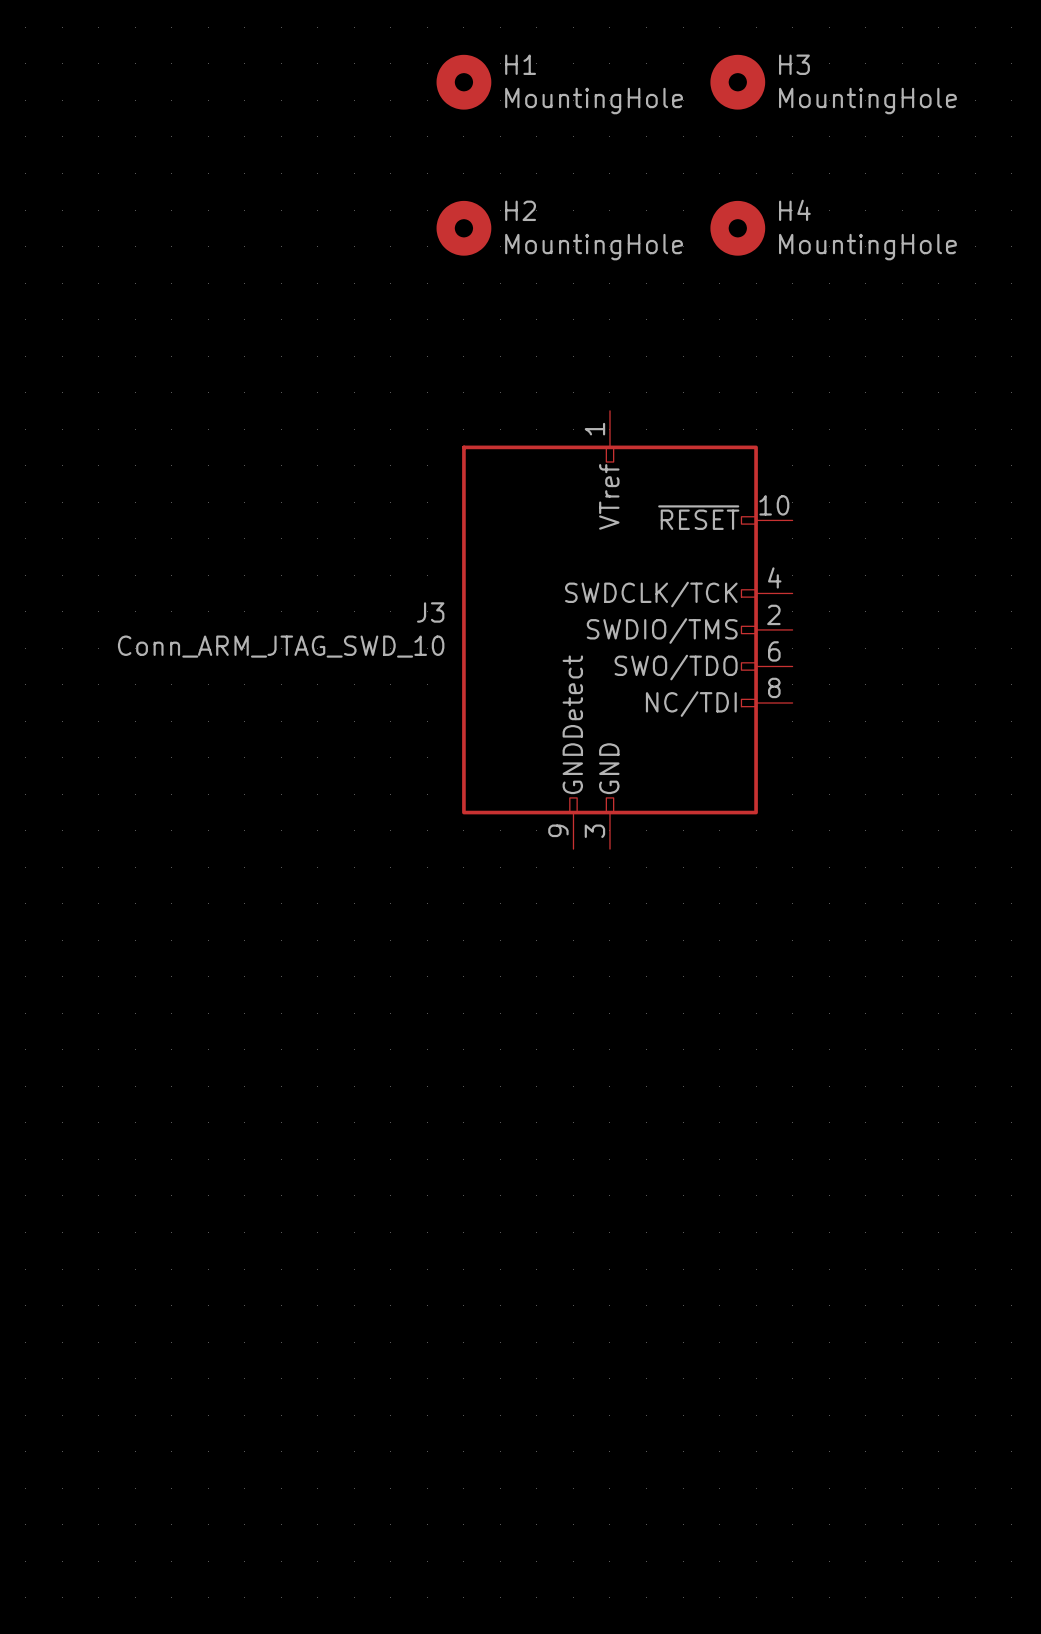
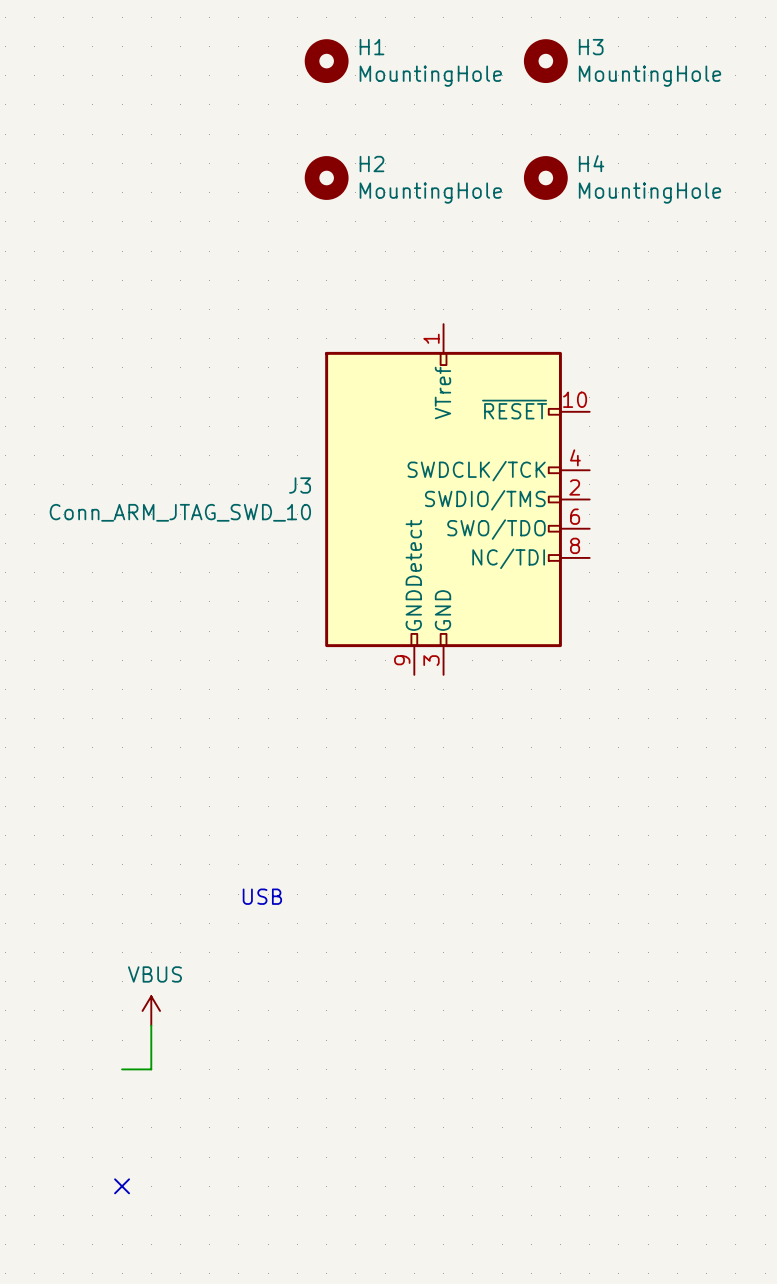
text: none -> USB (262, 896)
power symbol: none -> VBUS (151, 1010)
wire: none -> (151, 1025) (151, 1069) (122, 1069)
no-connect mark: none -> (122, 1186)

